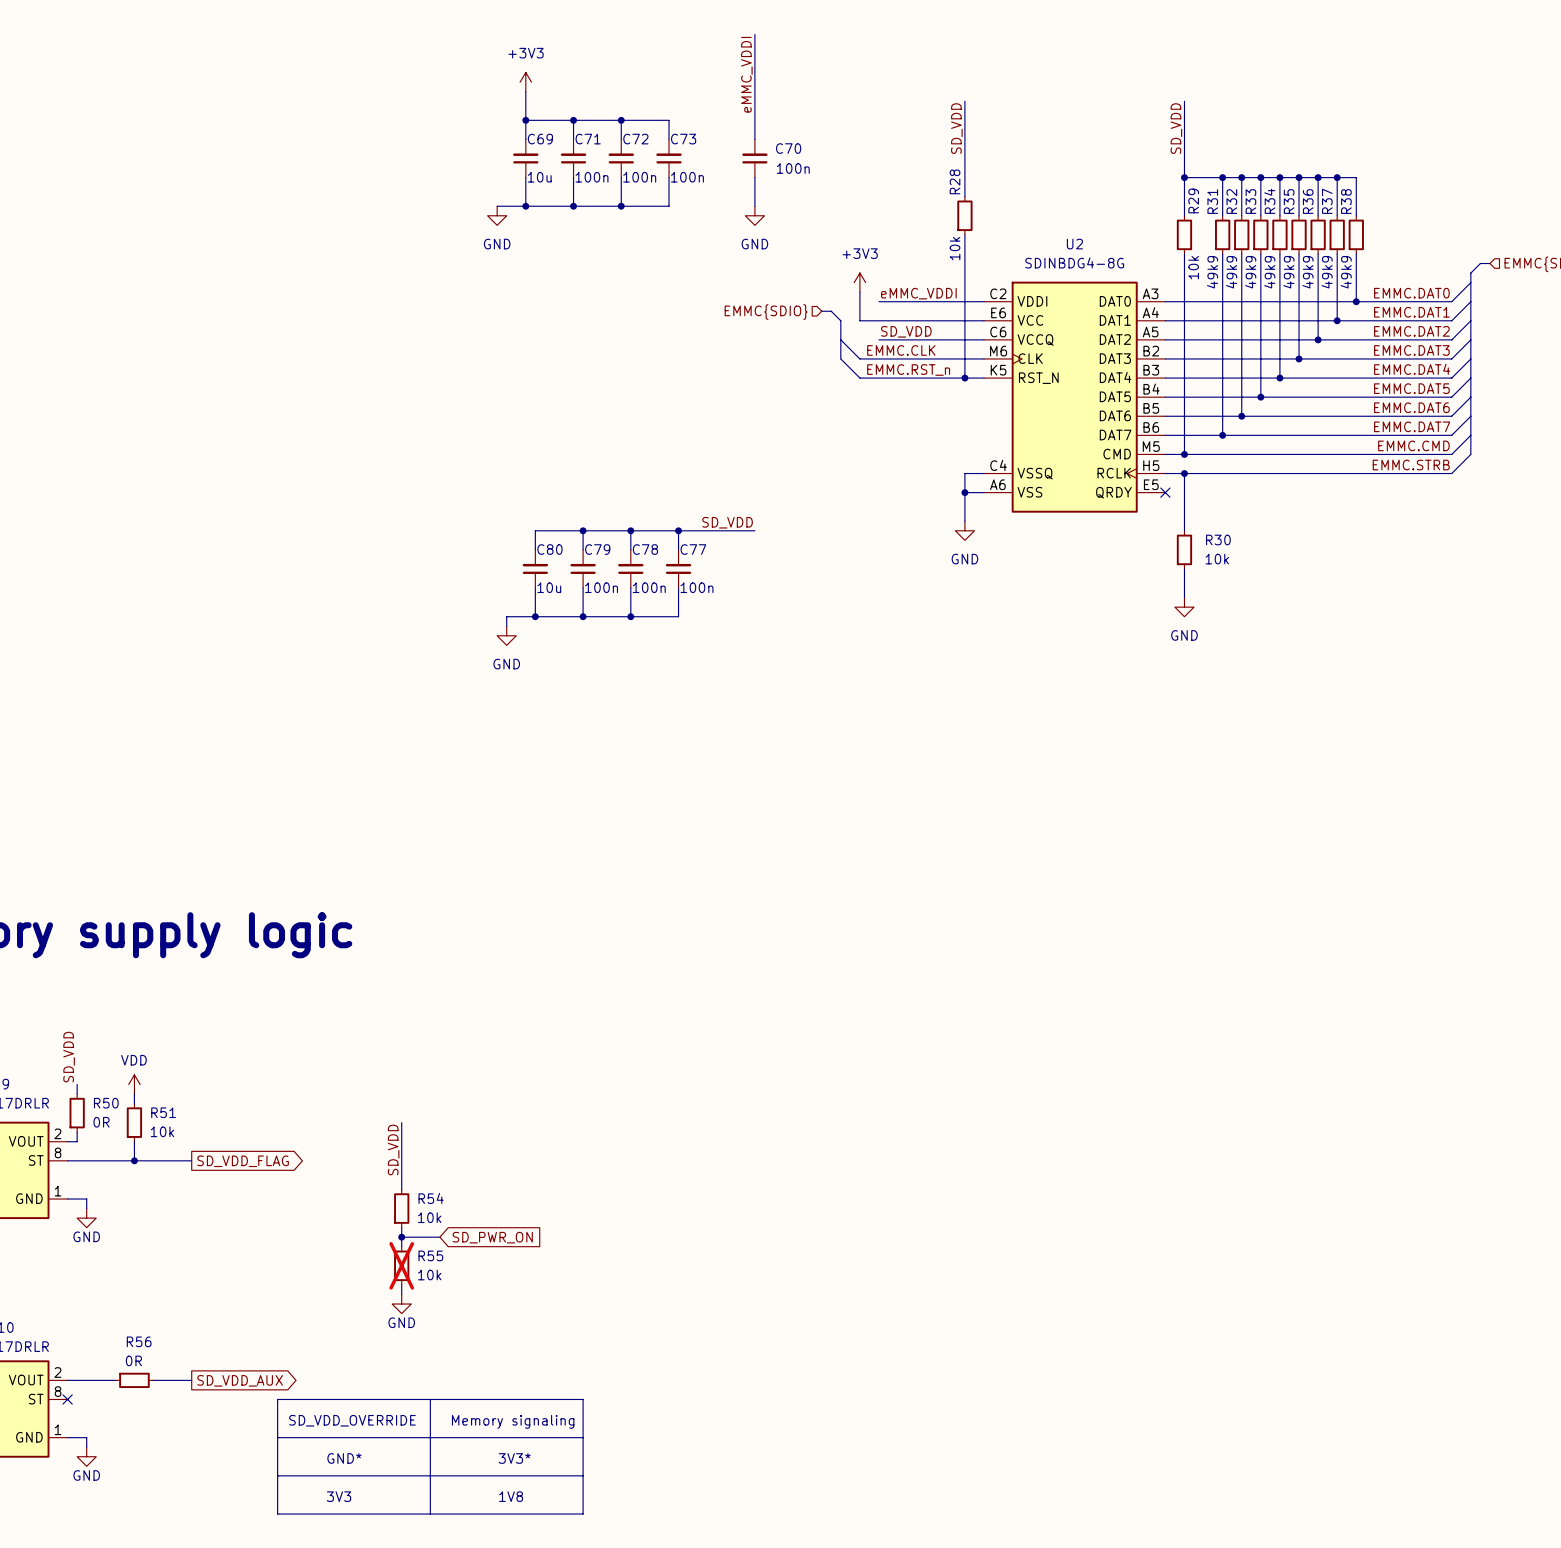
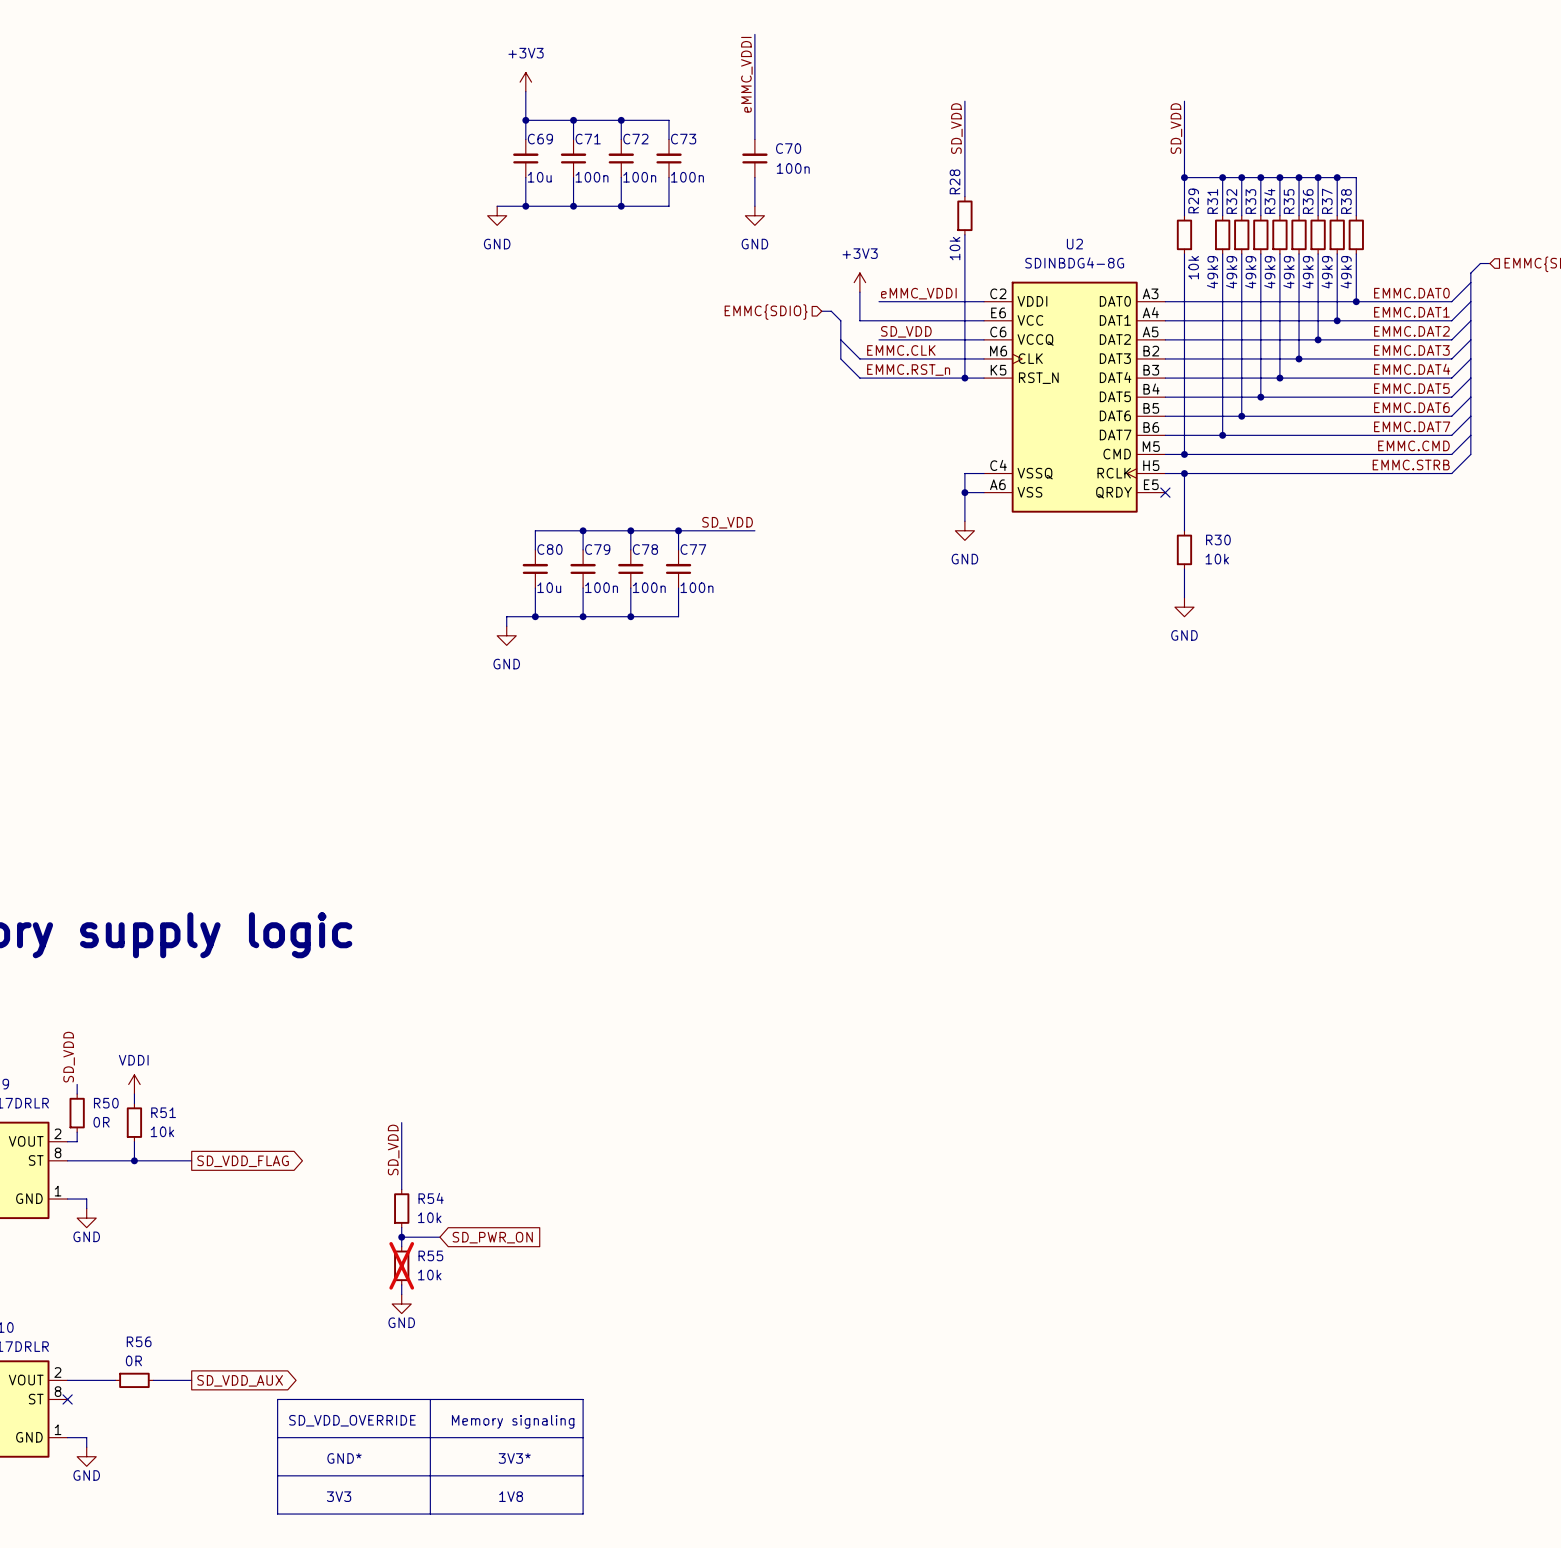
power symbol: VDD (134, 1084) -> VDDI (134, 1084)

